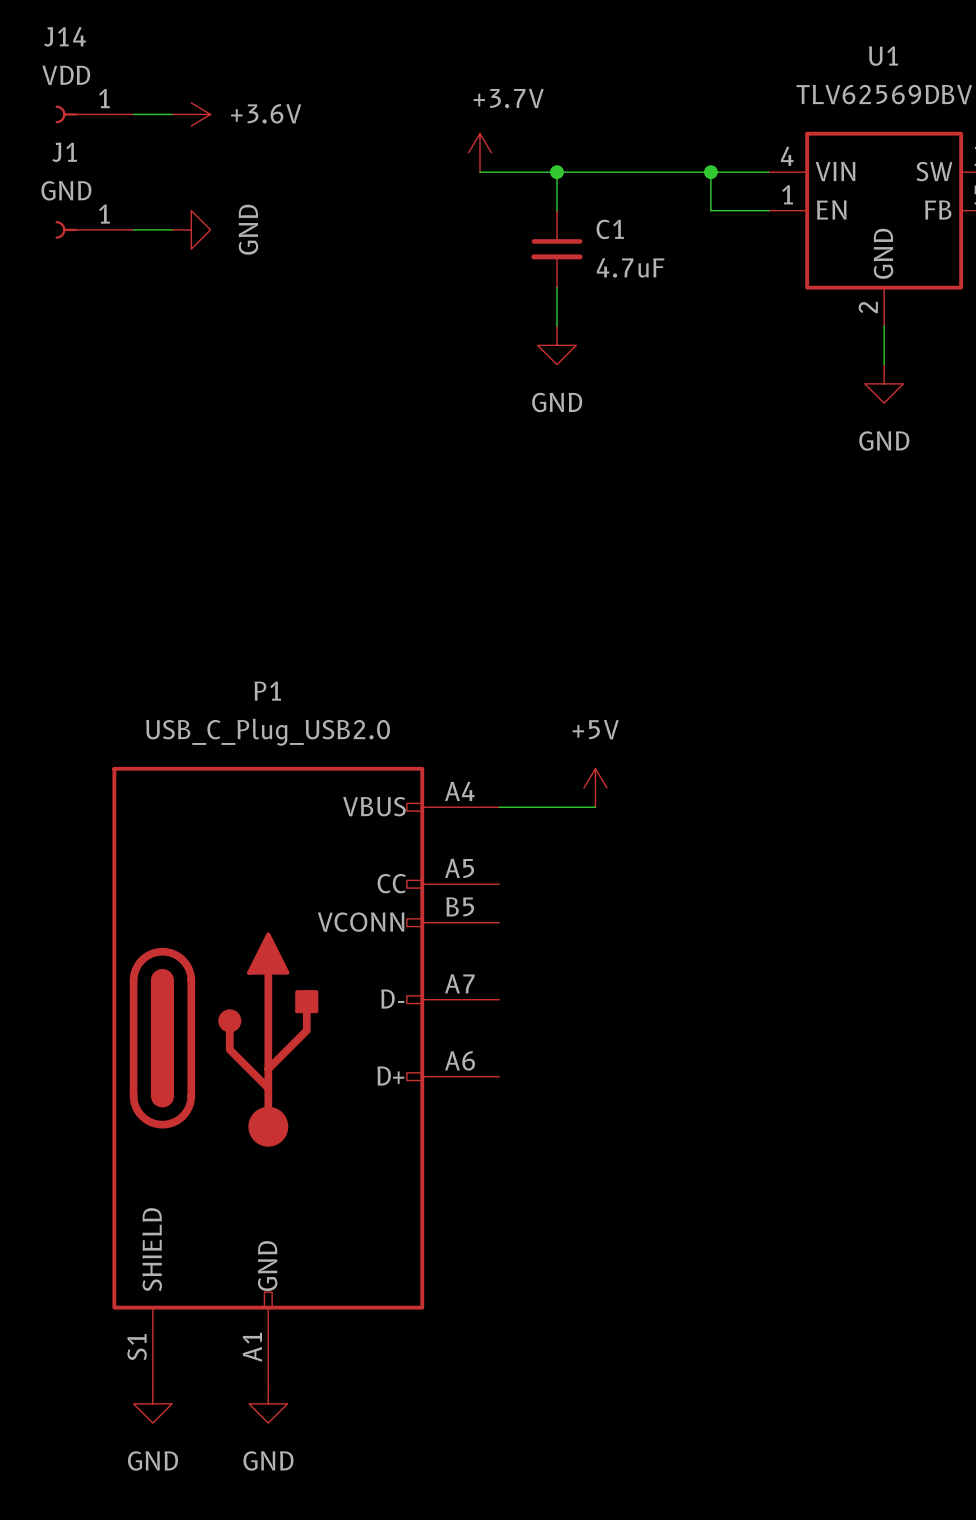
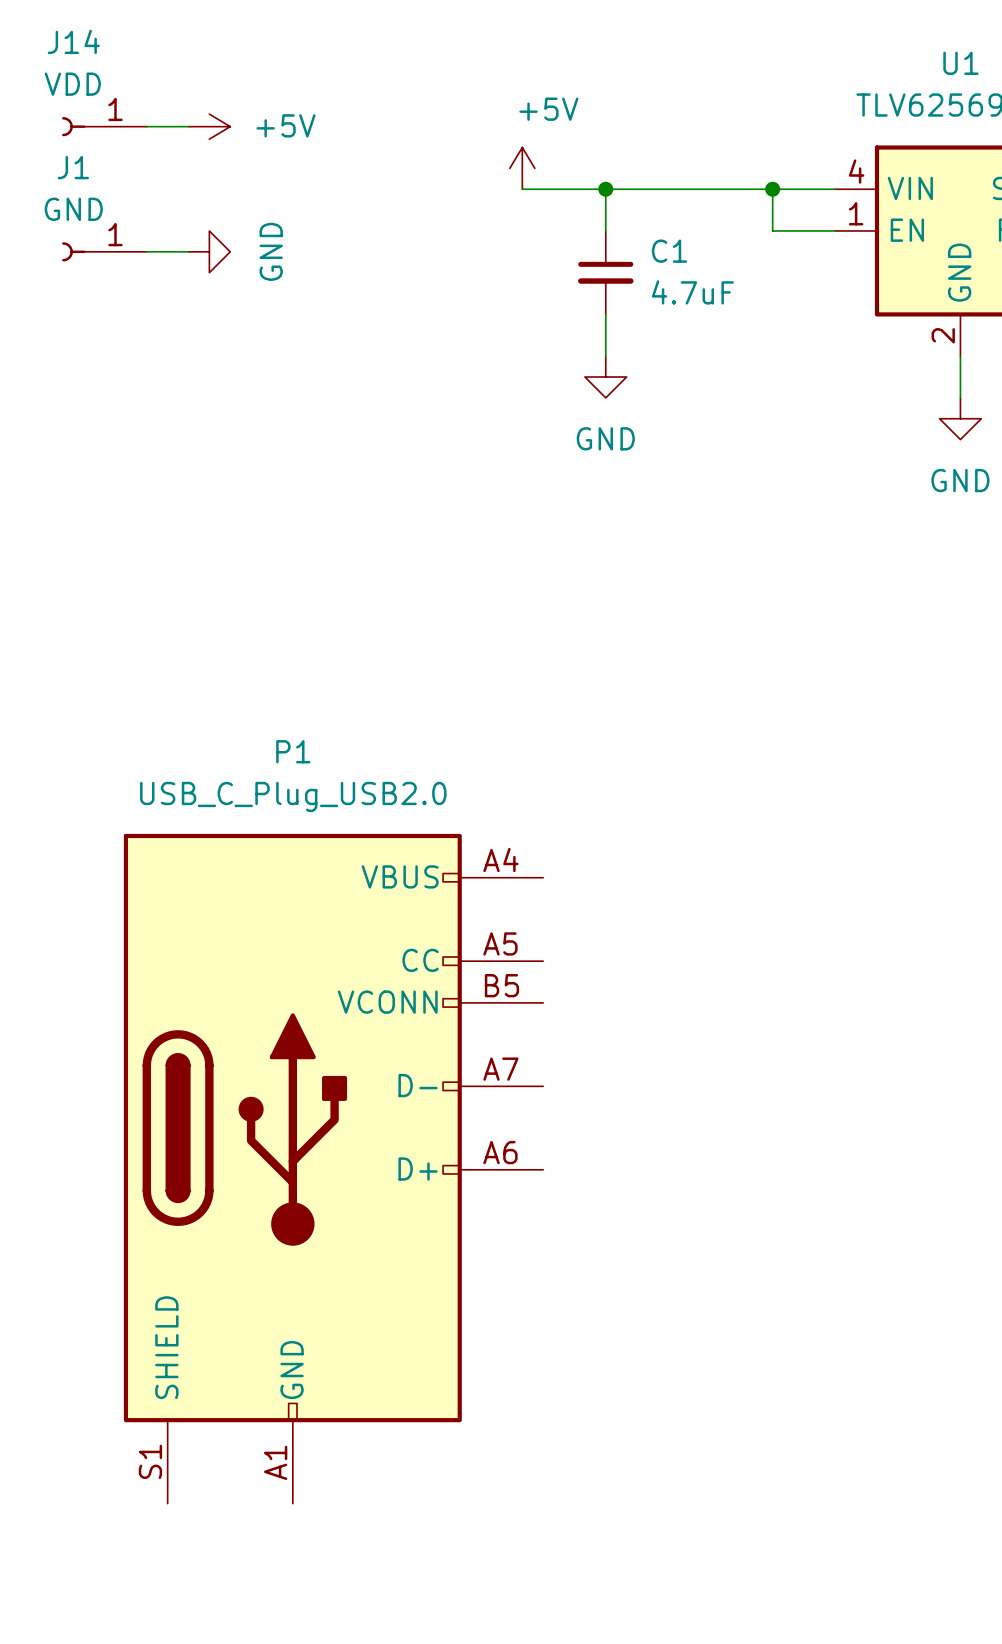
power symbol: +3.6V (191, 114) -> +5V (209, 126)
power symbol: +3.7V (479, 152) -> +5V (522, 168)
power symbol: +5V (595, 788) -> none
wire: (499, 807) (595, 807) -> none
power symbol: GND (152, 1403) -> none
power symbol: GND (268, 1403) -> none

